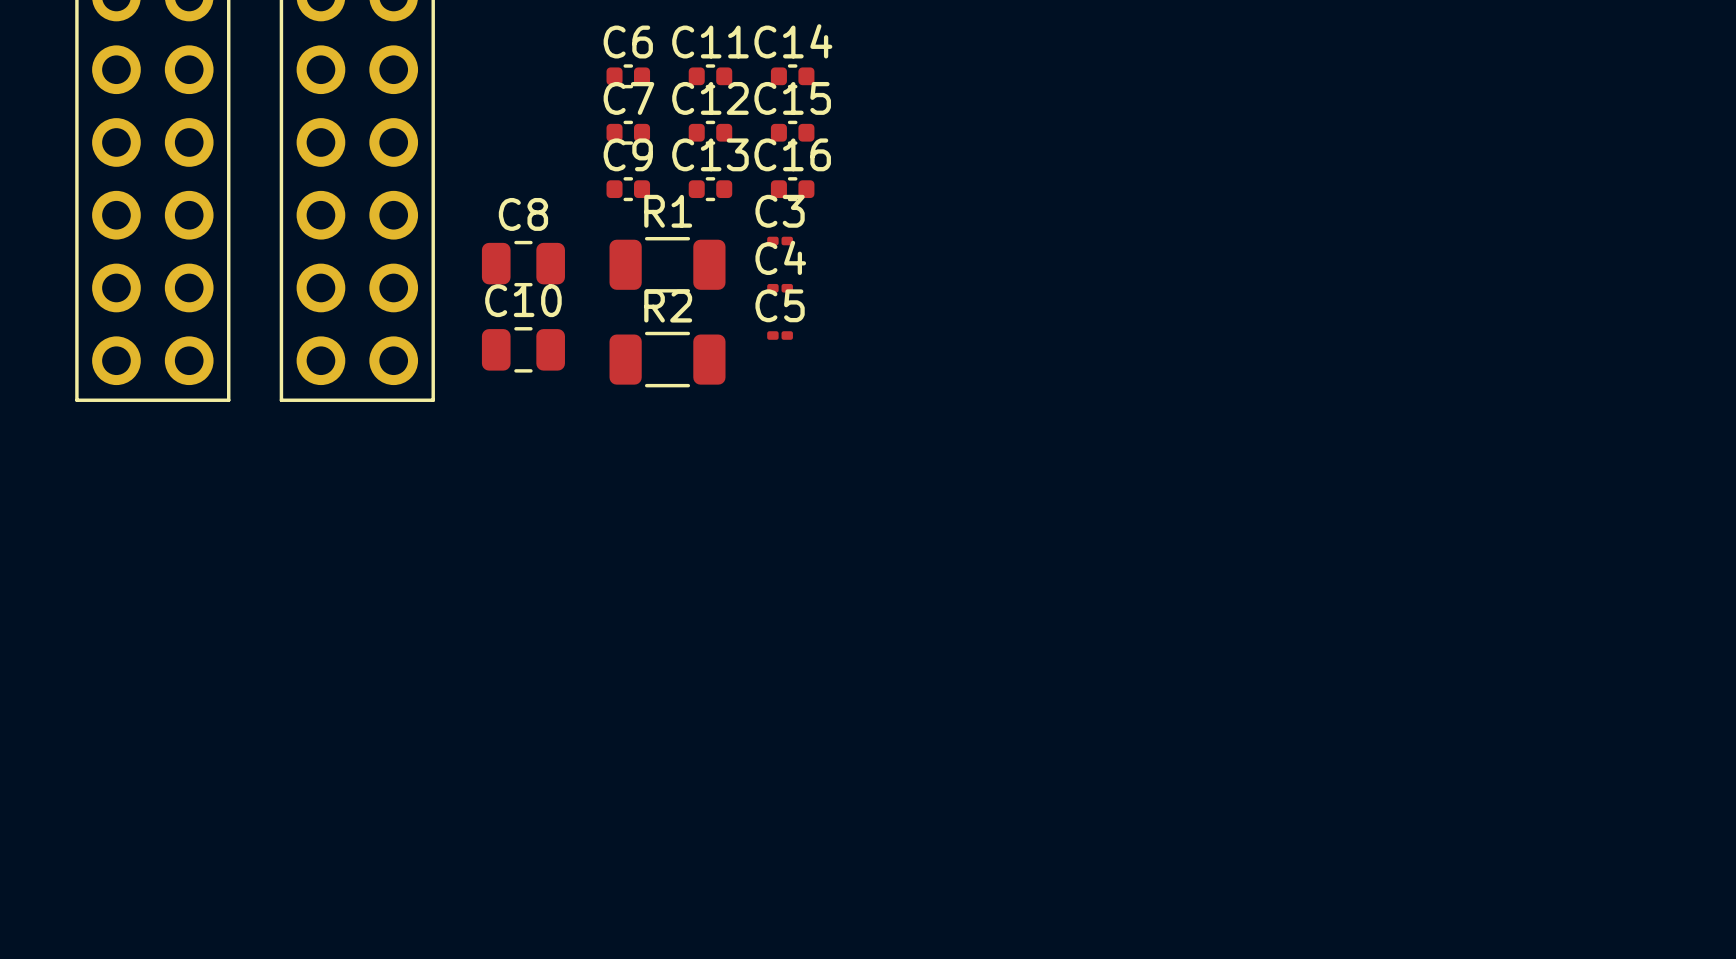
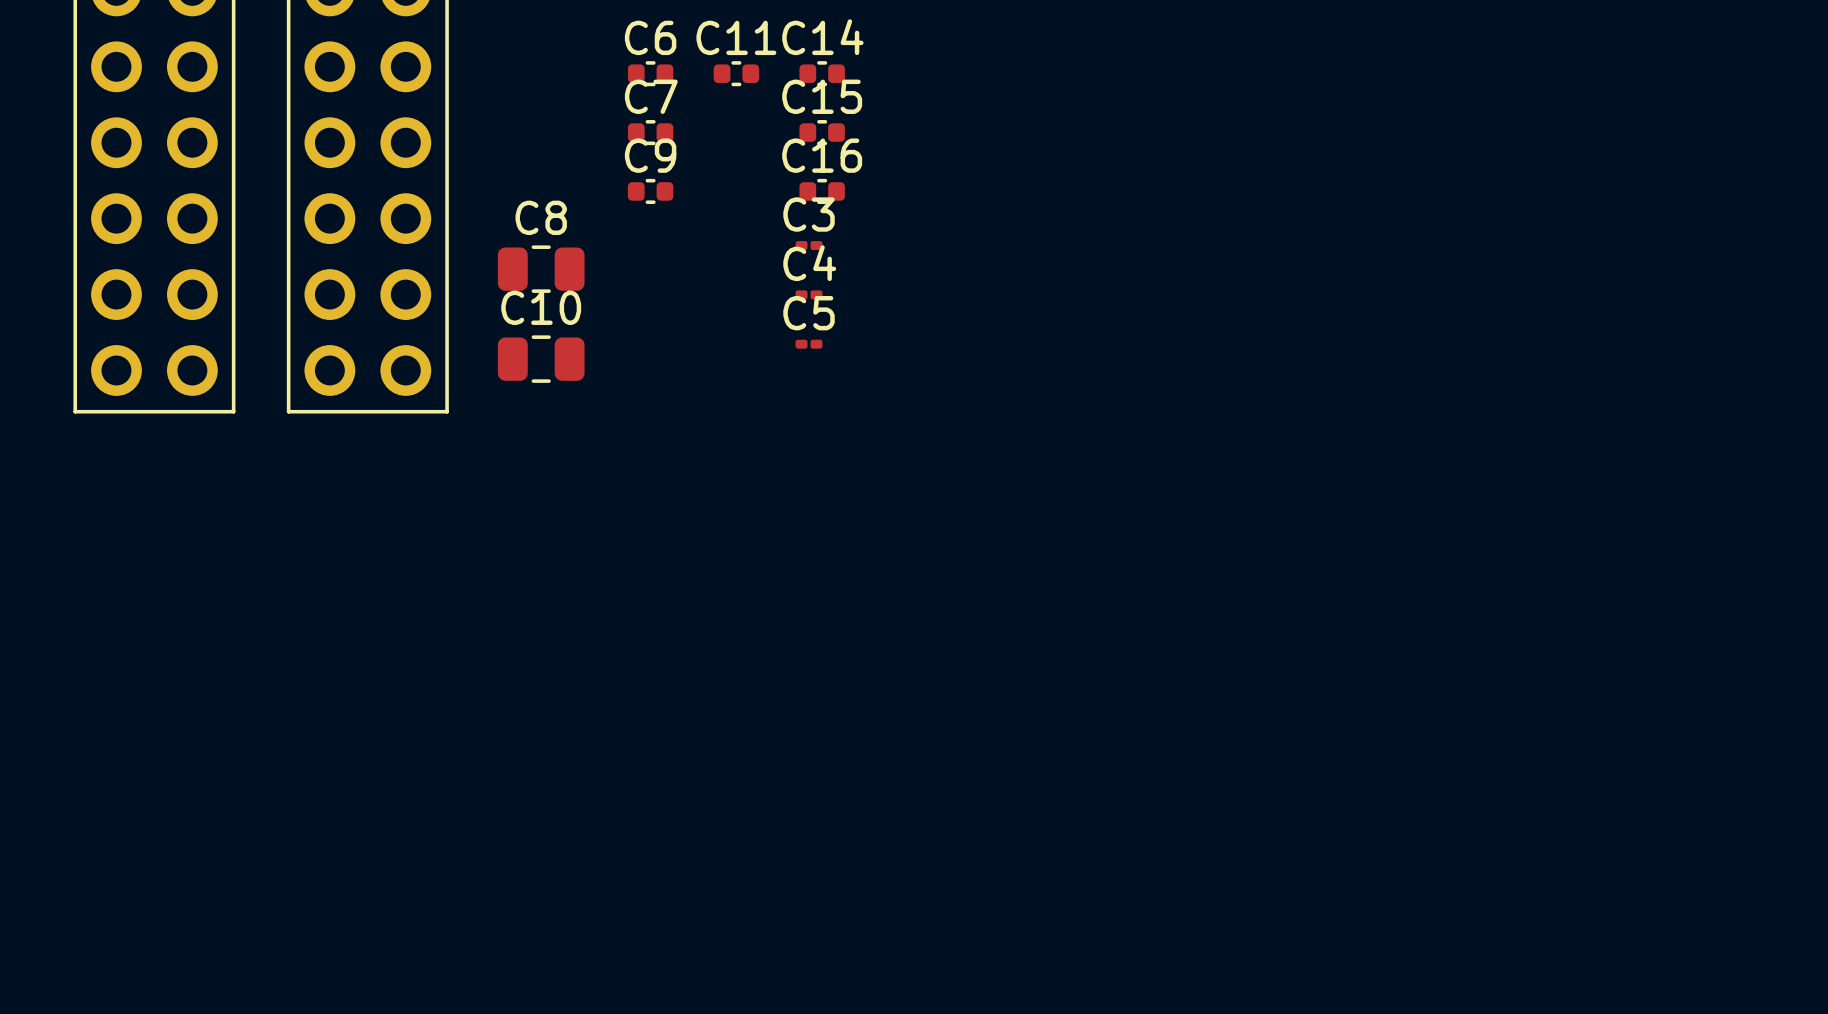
C12: (710, 132) -> none
C13: (710, 189) -> none
R1: (667, 264) -> none
R2: (667, 359) -> none

